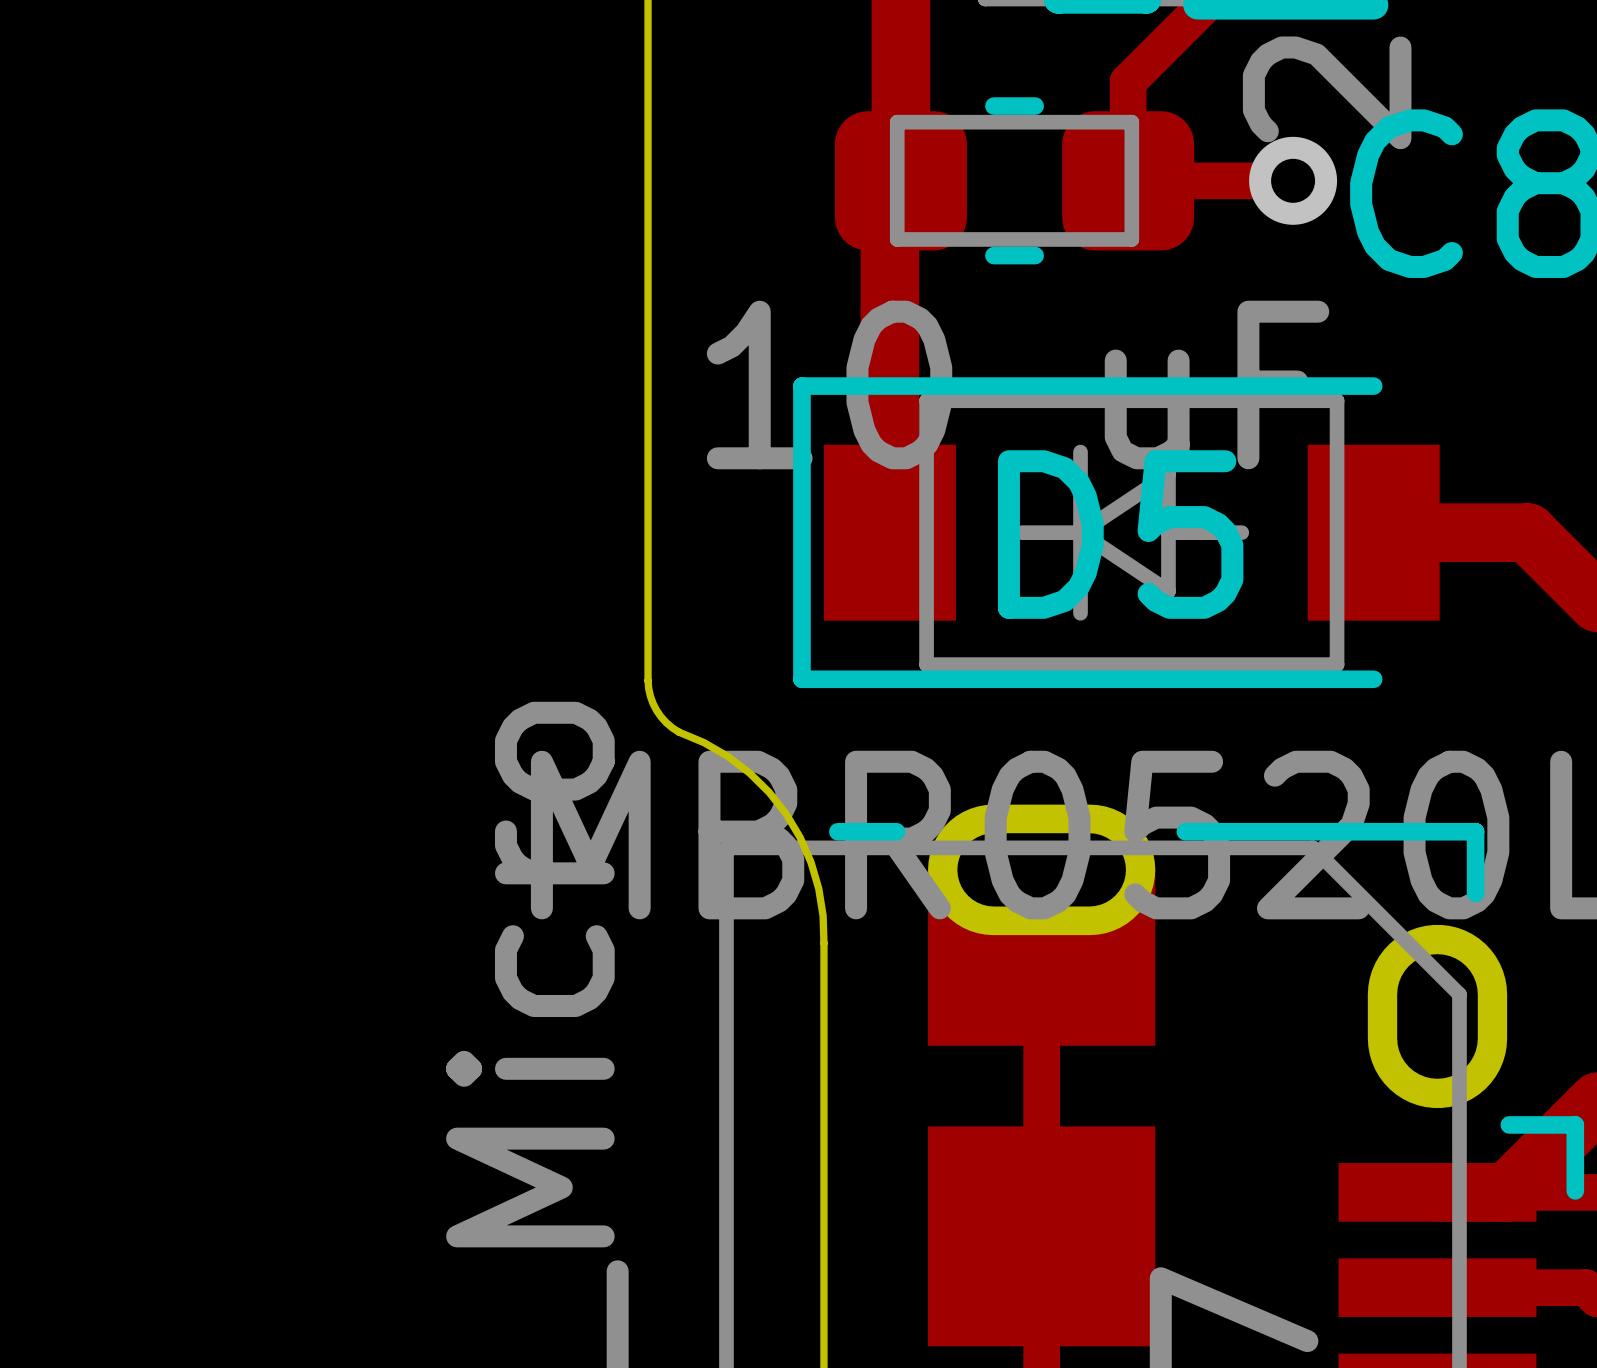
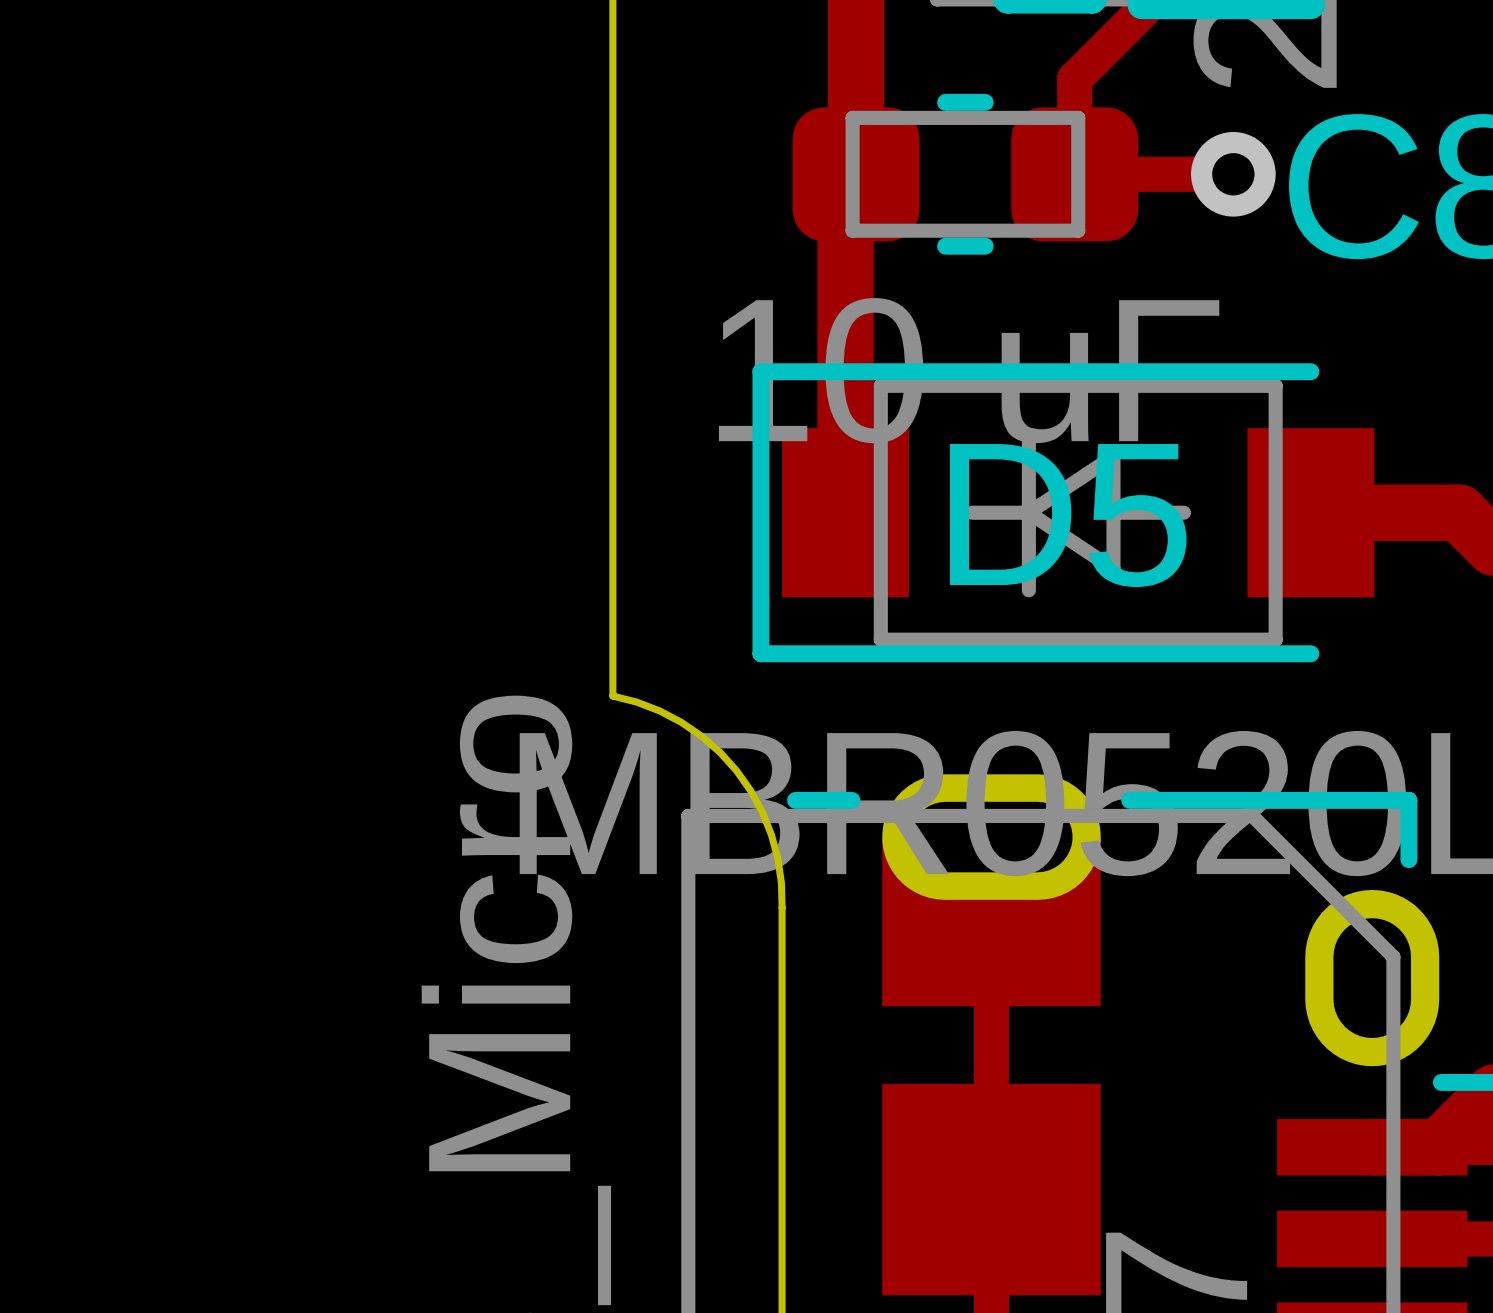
board edge: (648, 680) (653, 703) (666, 722) (678, 732) (704, 742) (727, 756) (749, 773) (769, 792) (786, 813) (800, 837) (811, 862) (818, 888) (823, 915) (823, 943) -> (612, 655) (612, 696) (659, 710) (701, 736) (736, 770) (750, 790) (771, 835) (777, 858) (782, 907)

